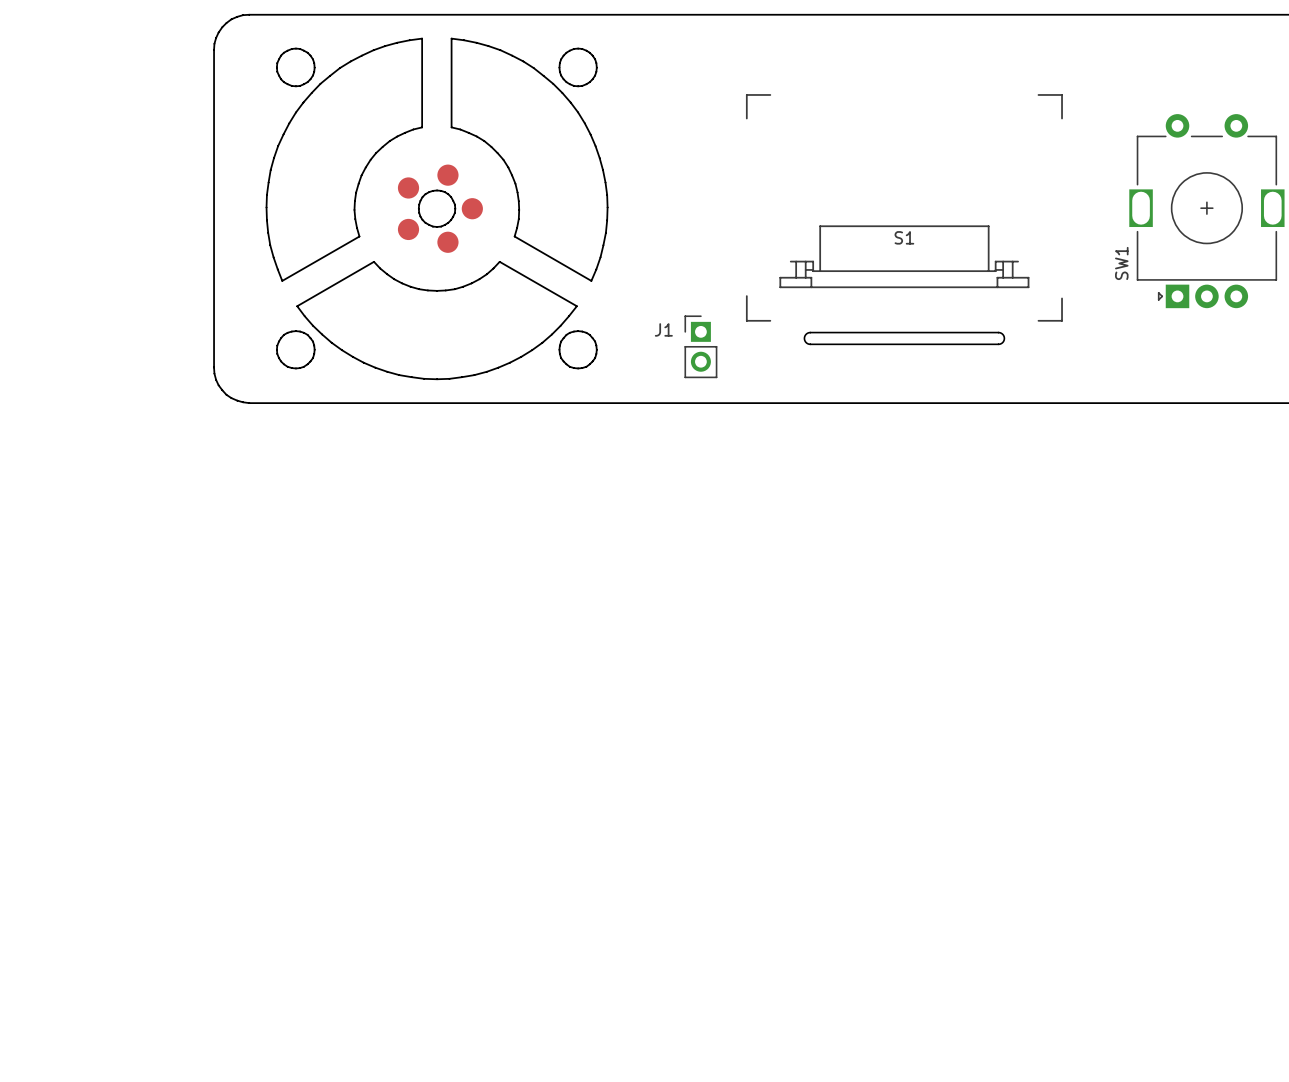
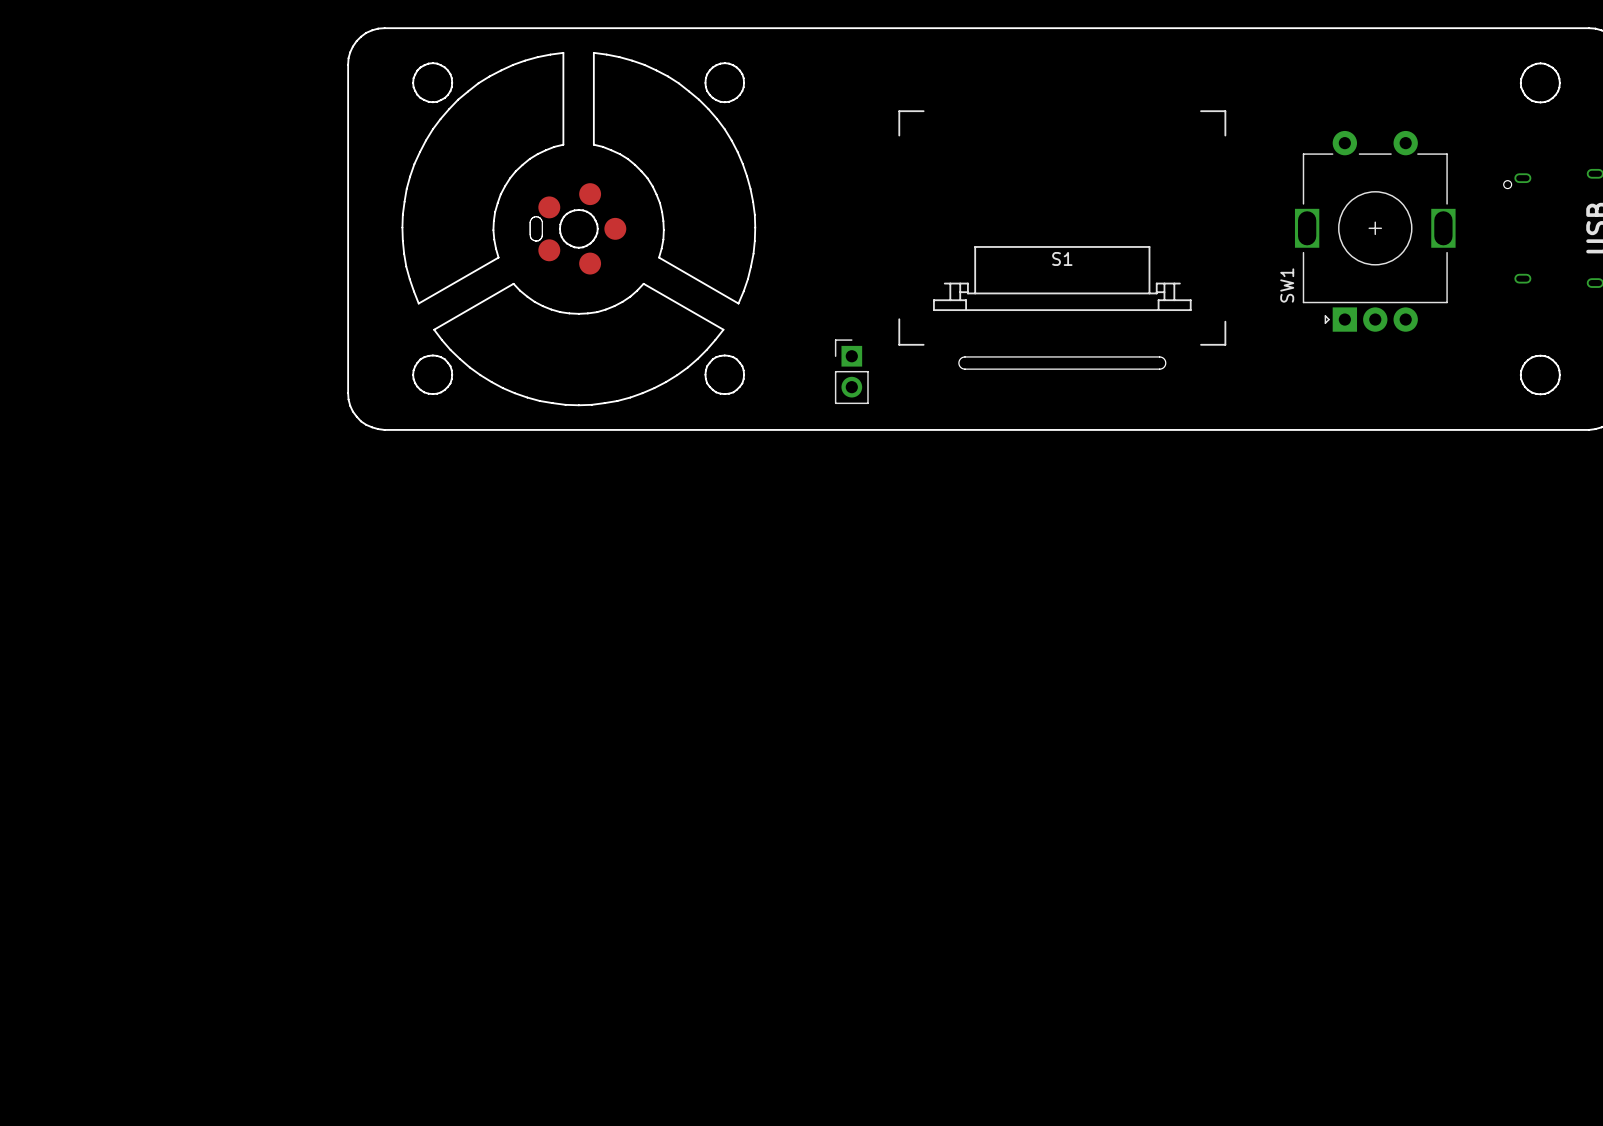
board edge: none -> (542, 221) (536, 216) (530, 220) (530, 237) (533, 240) (538, 240) (542, 236) (542, 221)
J1 name: J1 (663, 329) -> none

